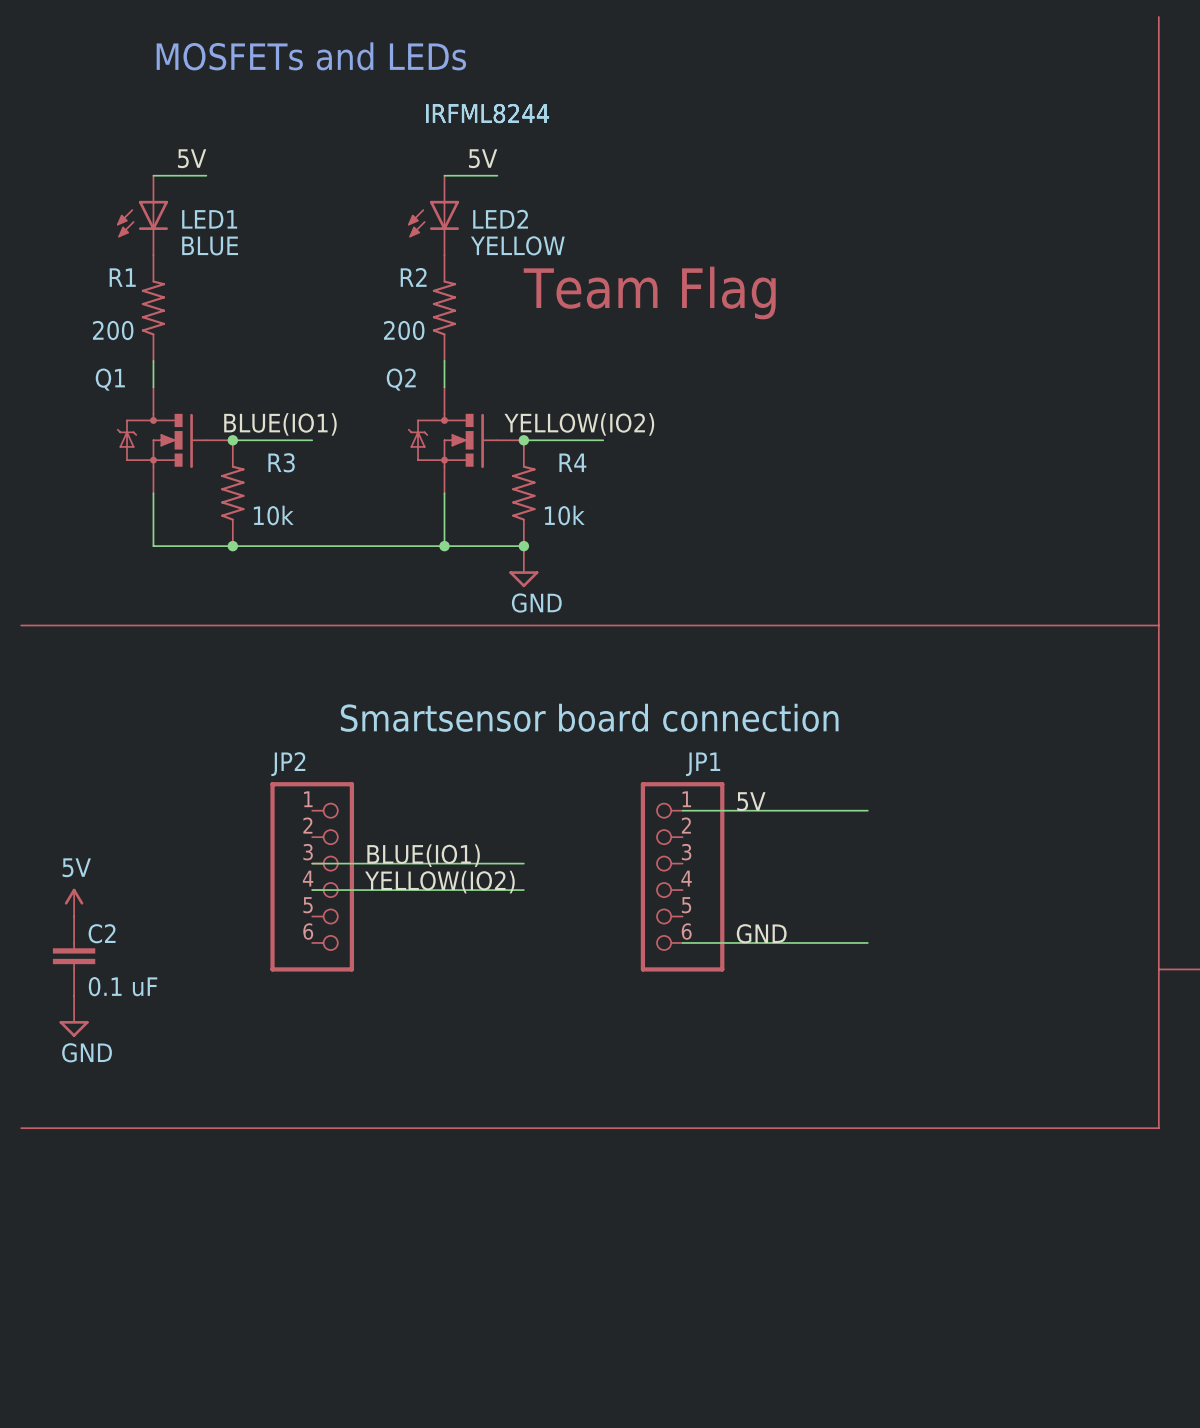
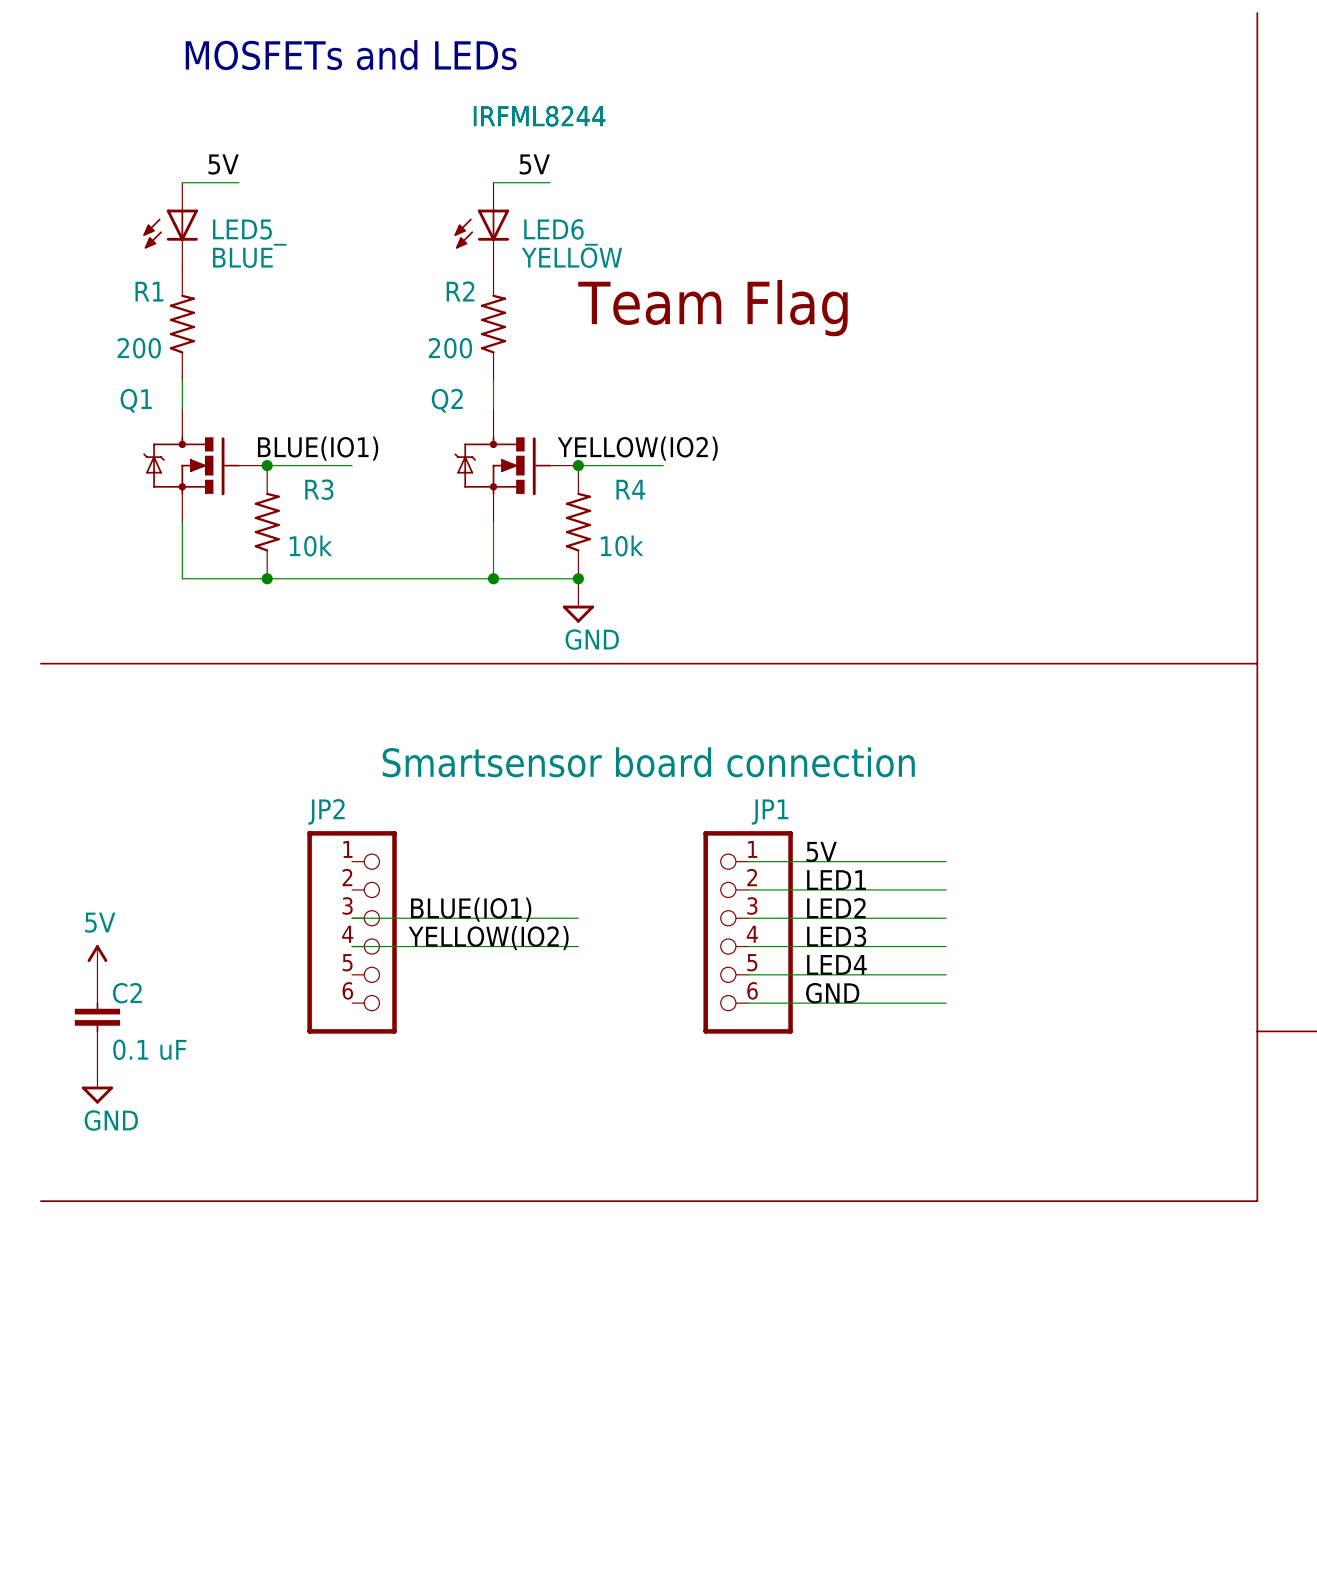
LED1 name: LED1 (209, 219) -> LED5_ (249, 232)
LED2 name: LED2 (500, 219) -> LED6_ (560, 232)
label: none -> LED1 (836, 880)
wire: none -> (748, 889) (946, 889)
label: none -> LED2 (836, 908)
wire: none -> (748, 918) (946, 918)
label: none -> LED3 (836, 936)
wire: none -> (748, 946) (946, 946)
label: none -> LED4 (836, 964)
wire: none -> (748, 974) (946, 974)

